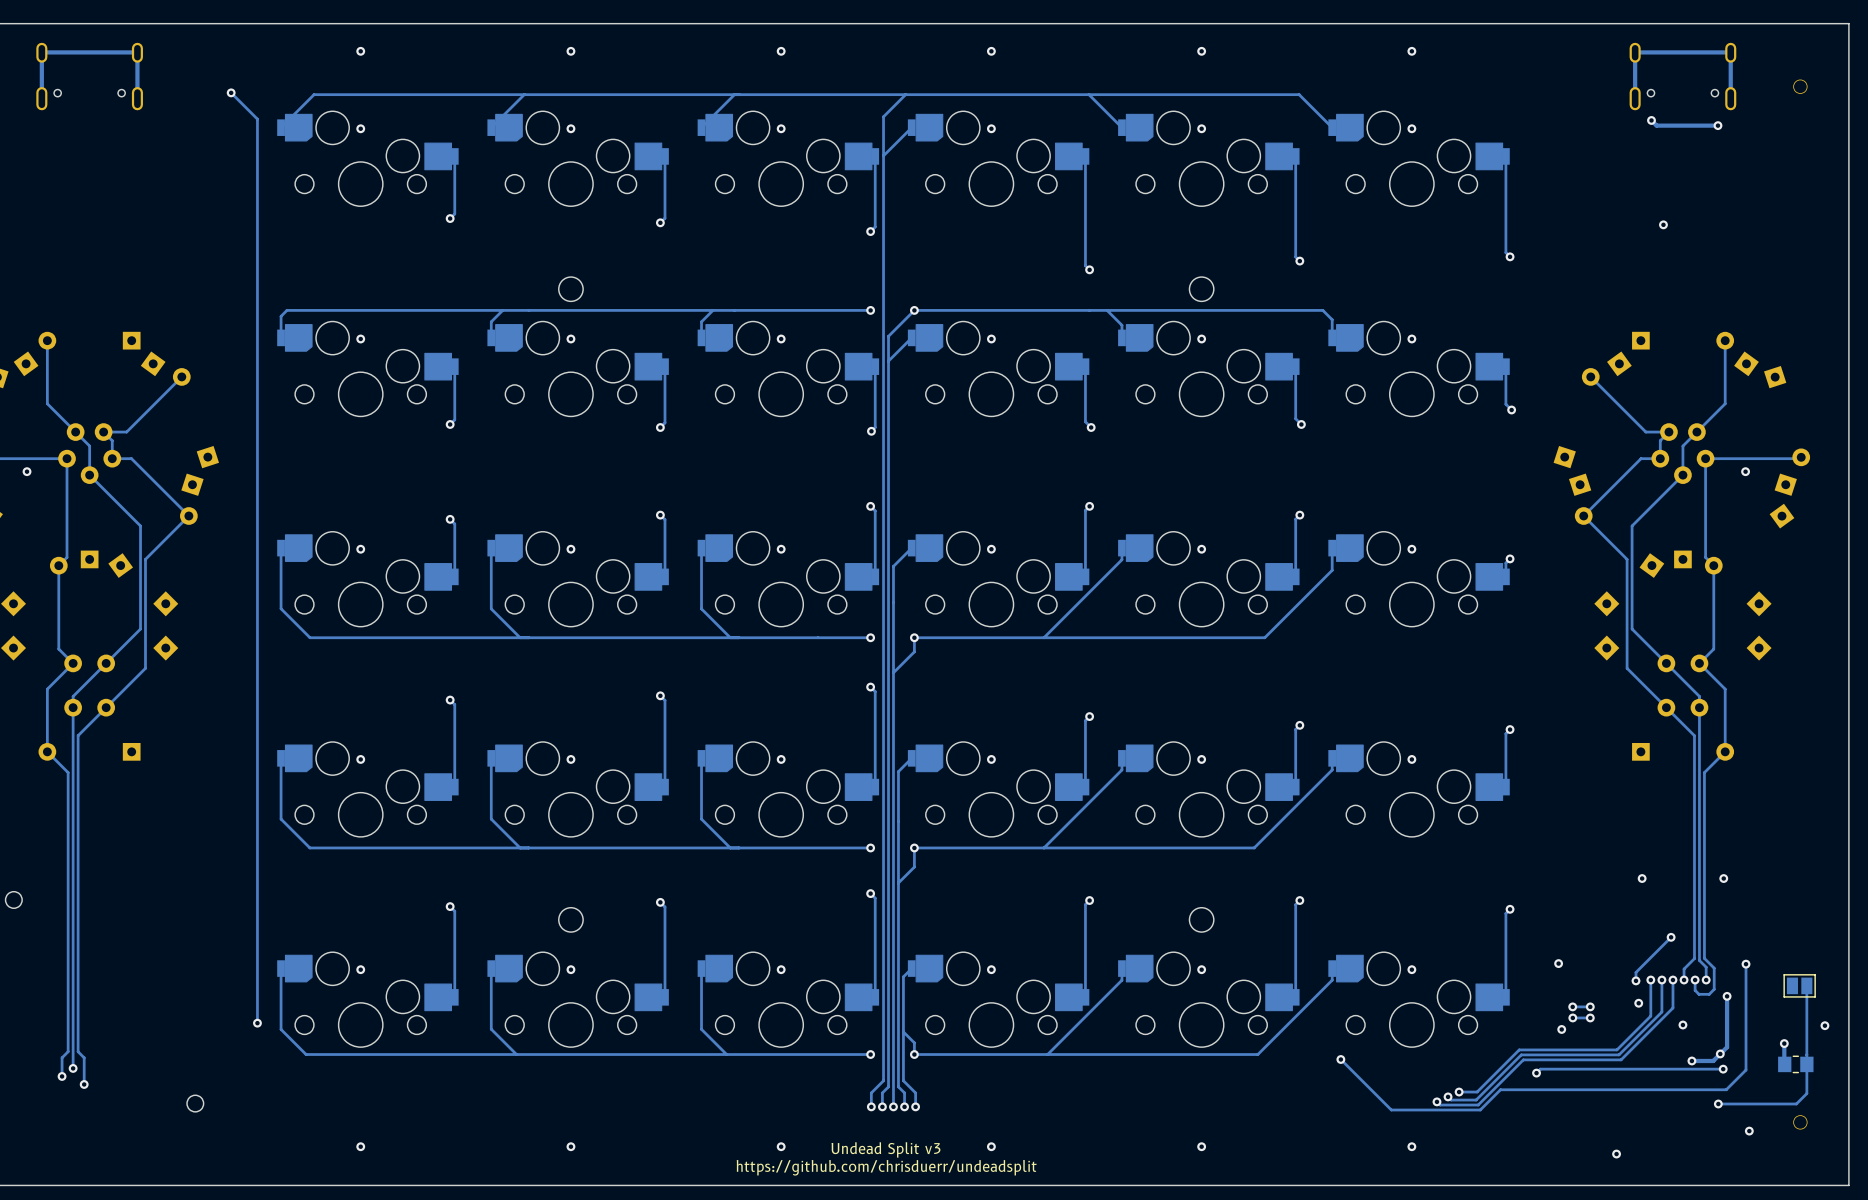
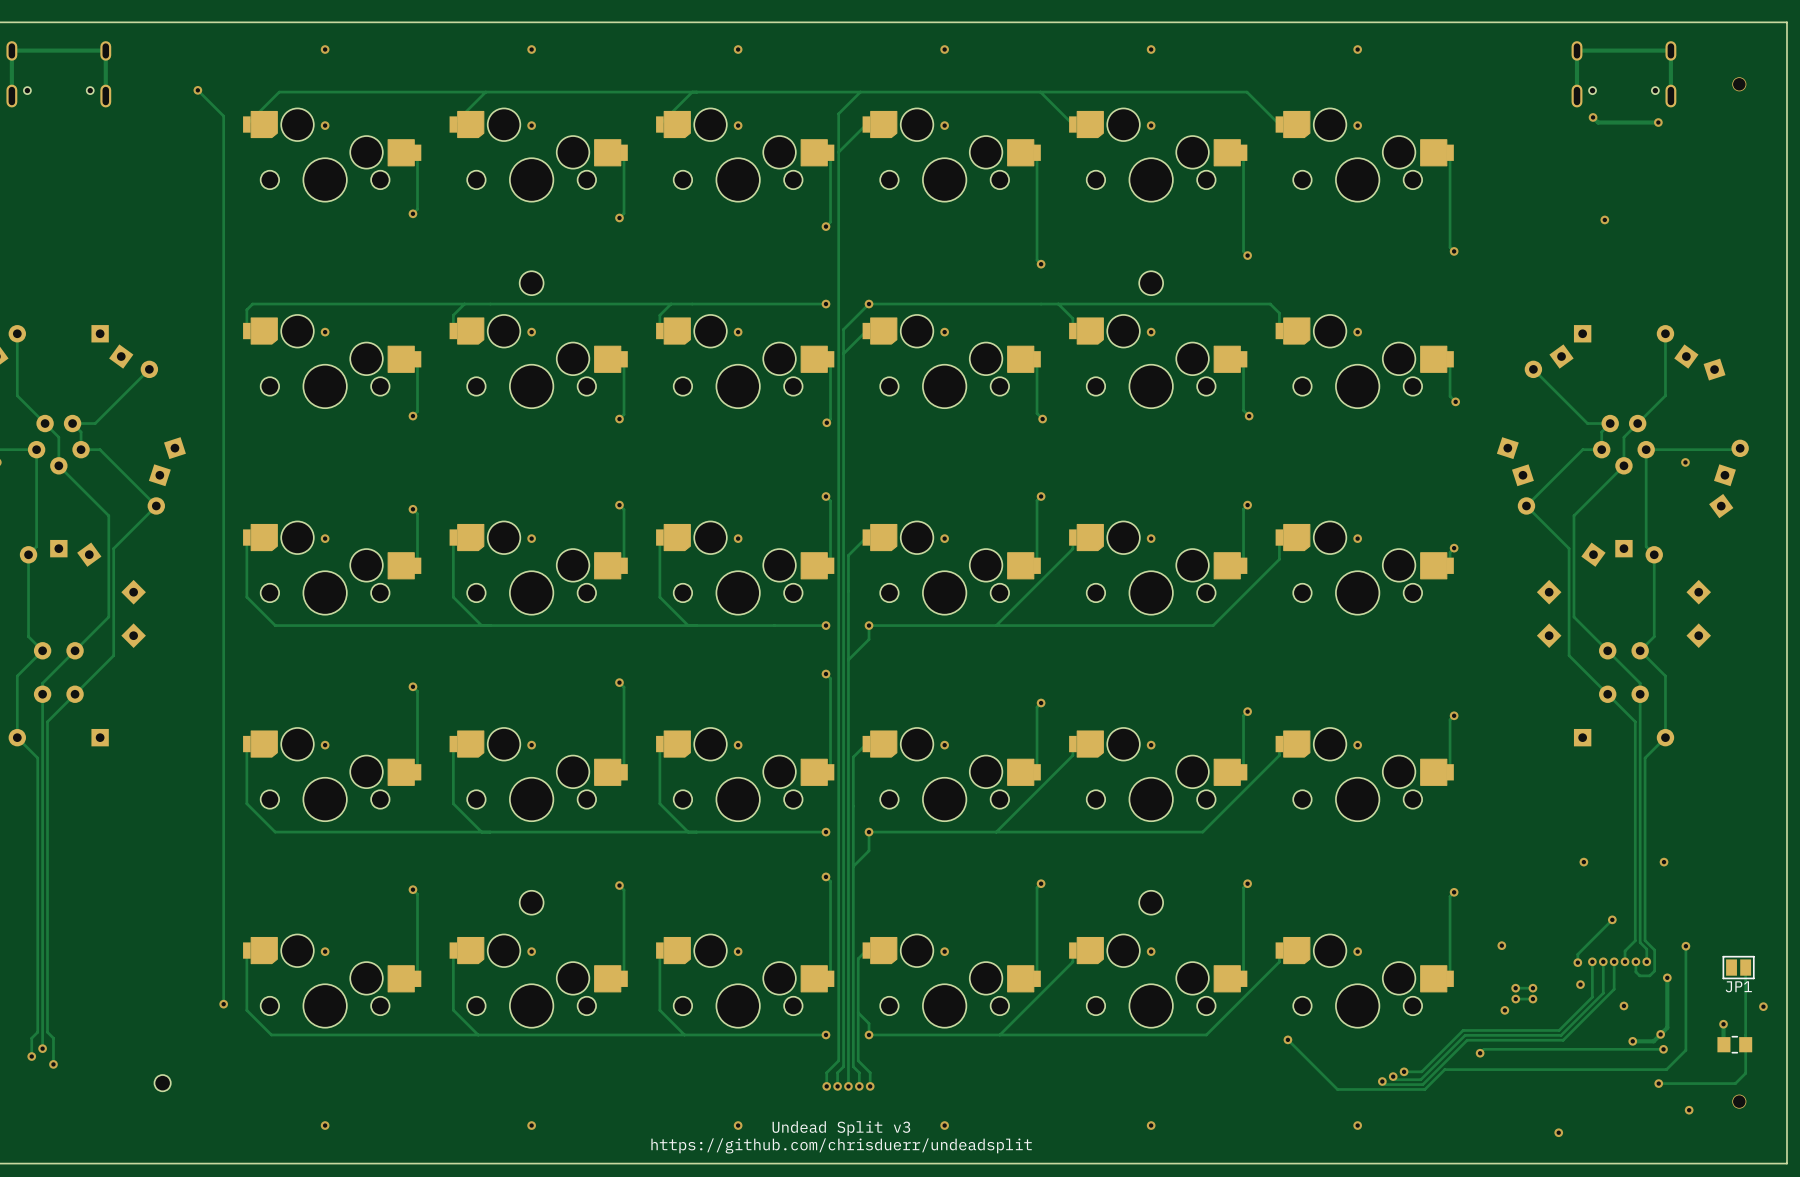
JP1 name: none -> JP1 (1738, 986)

